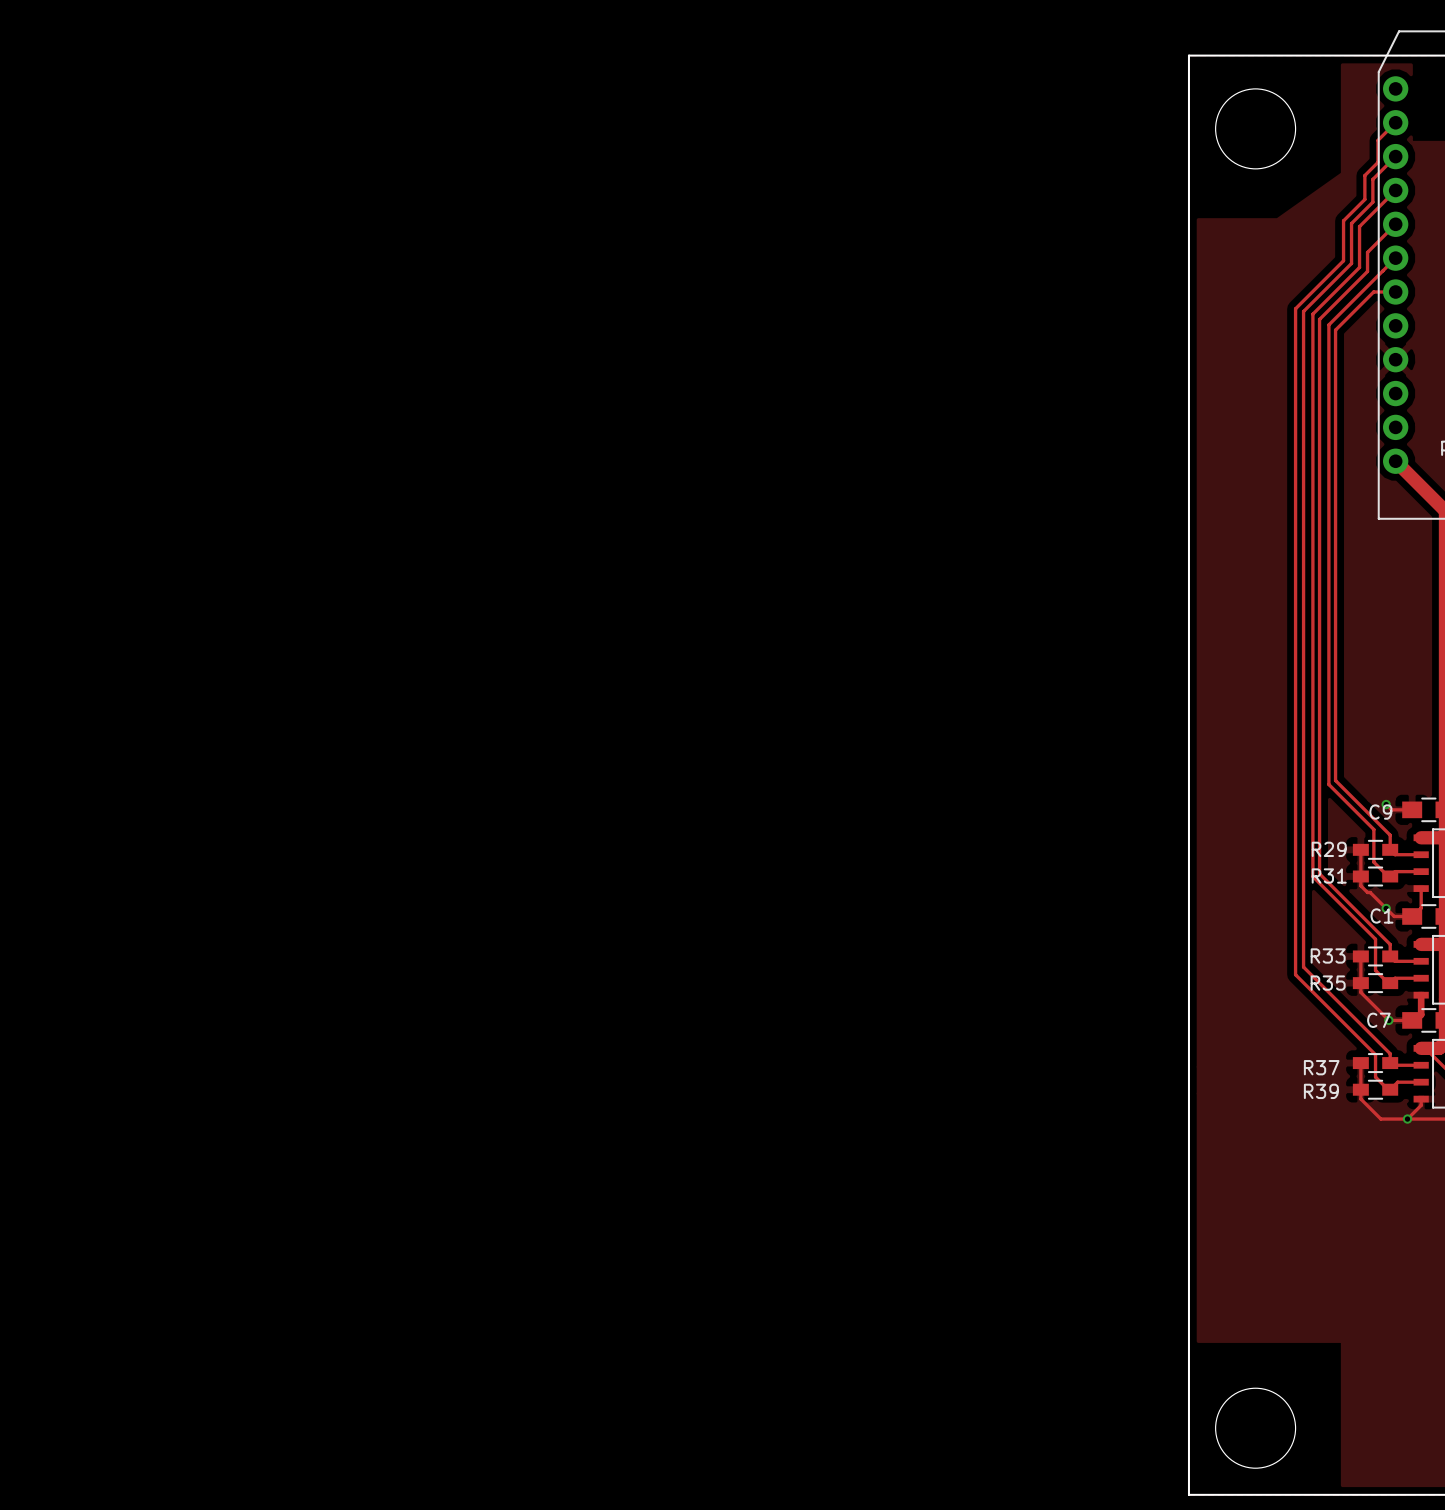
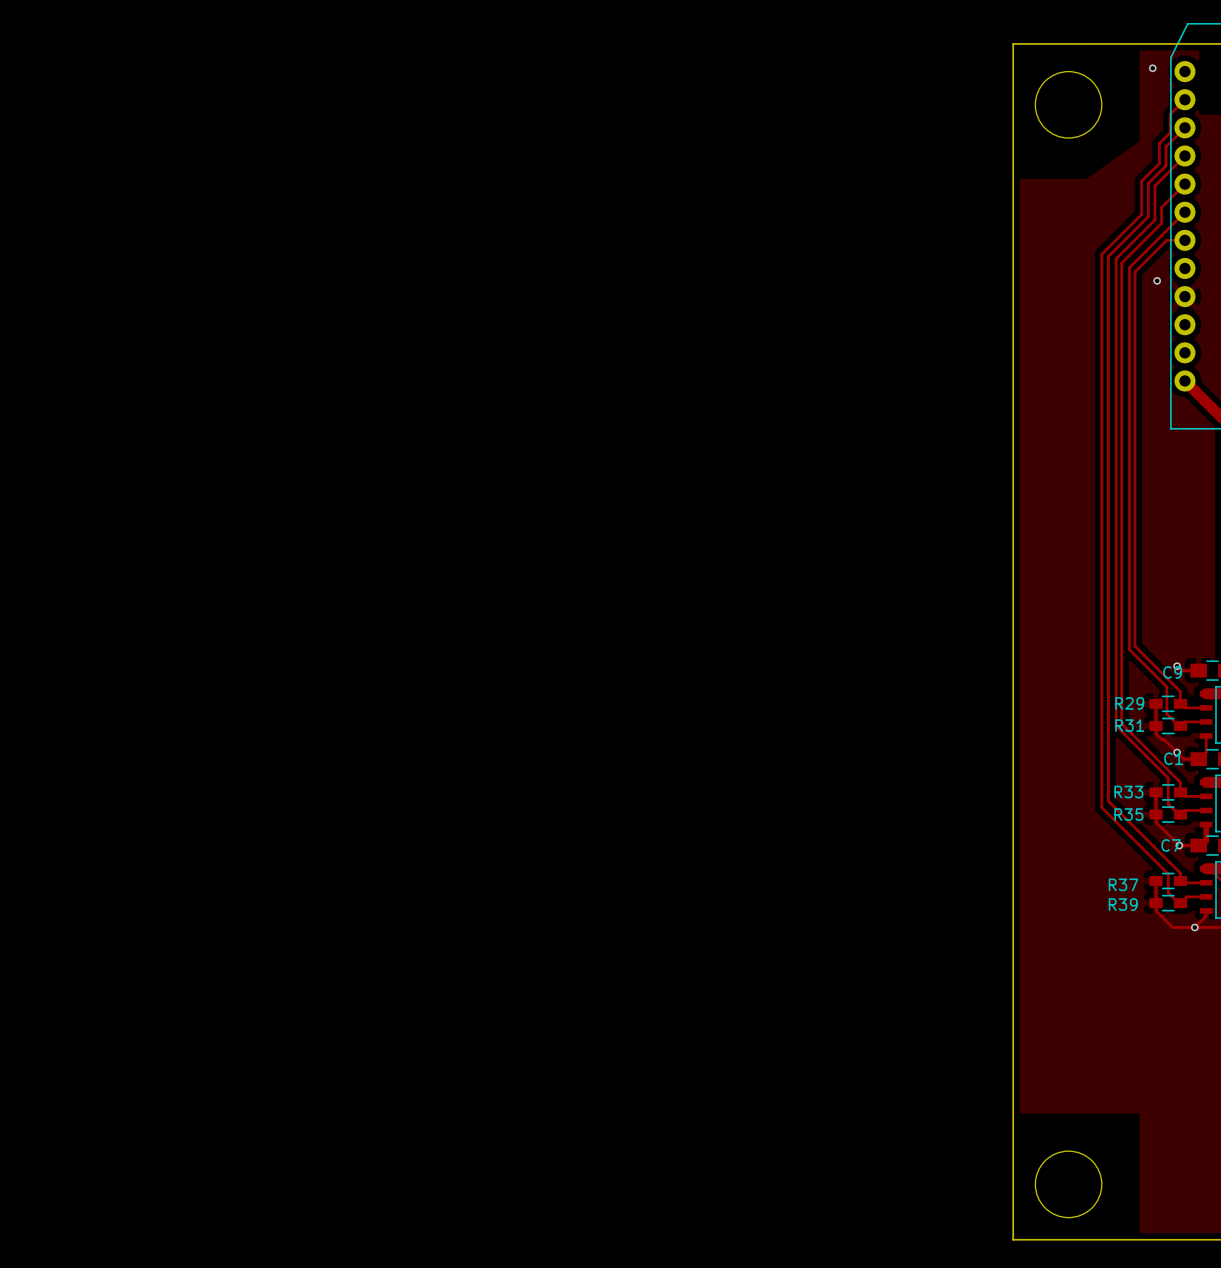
via: none -> (1152, 68)
via: none -> (1157, 280)

